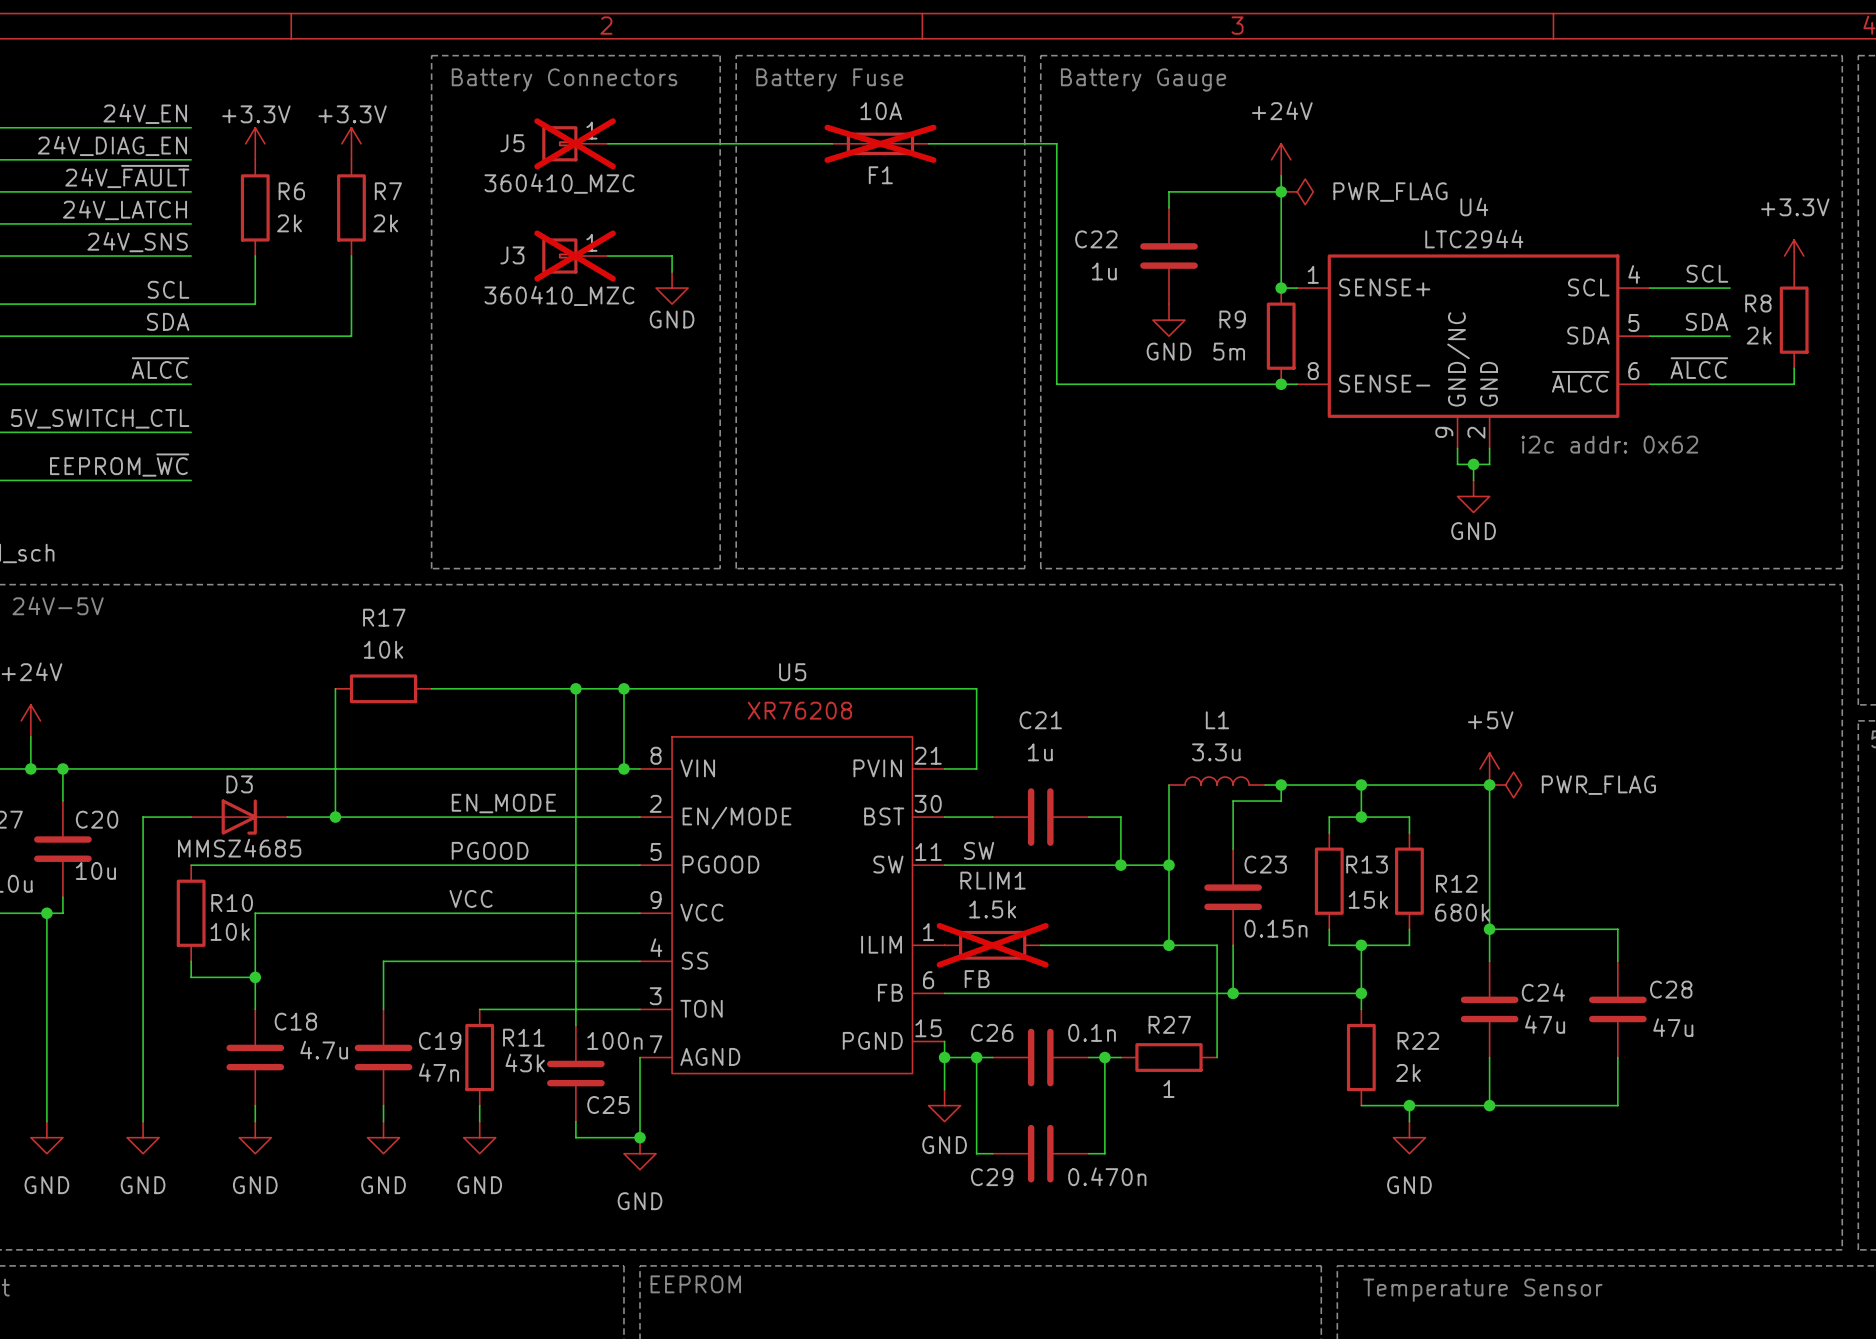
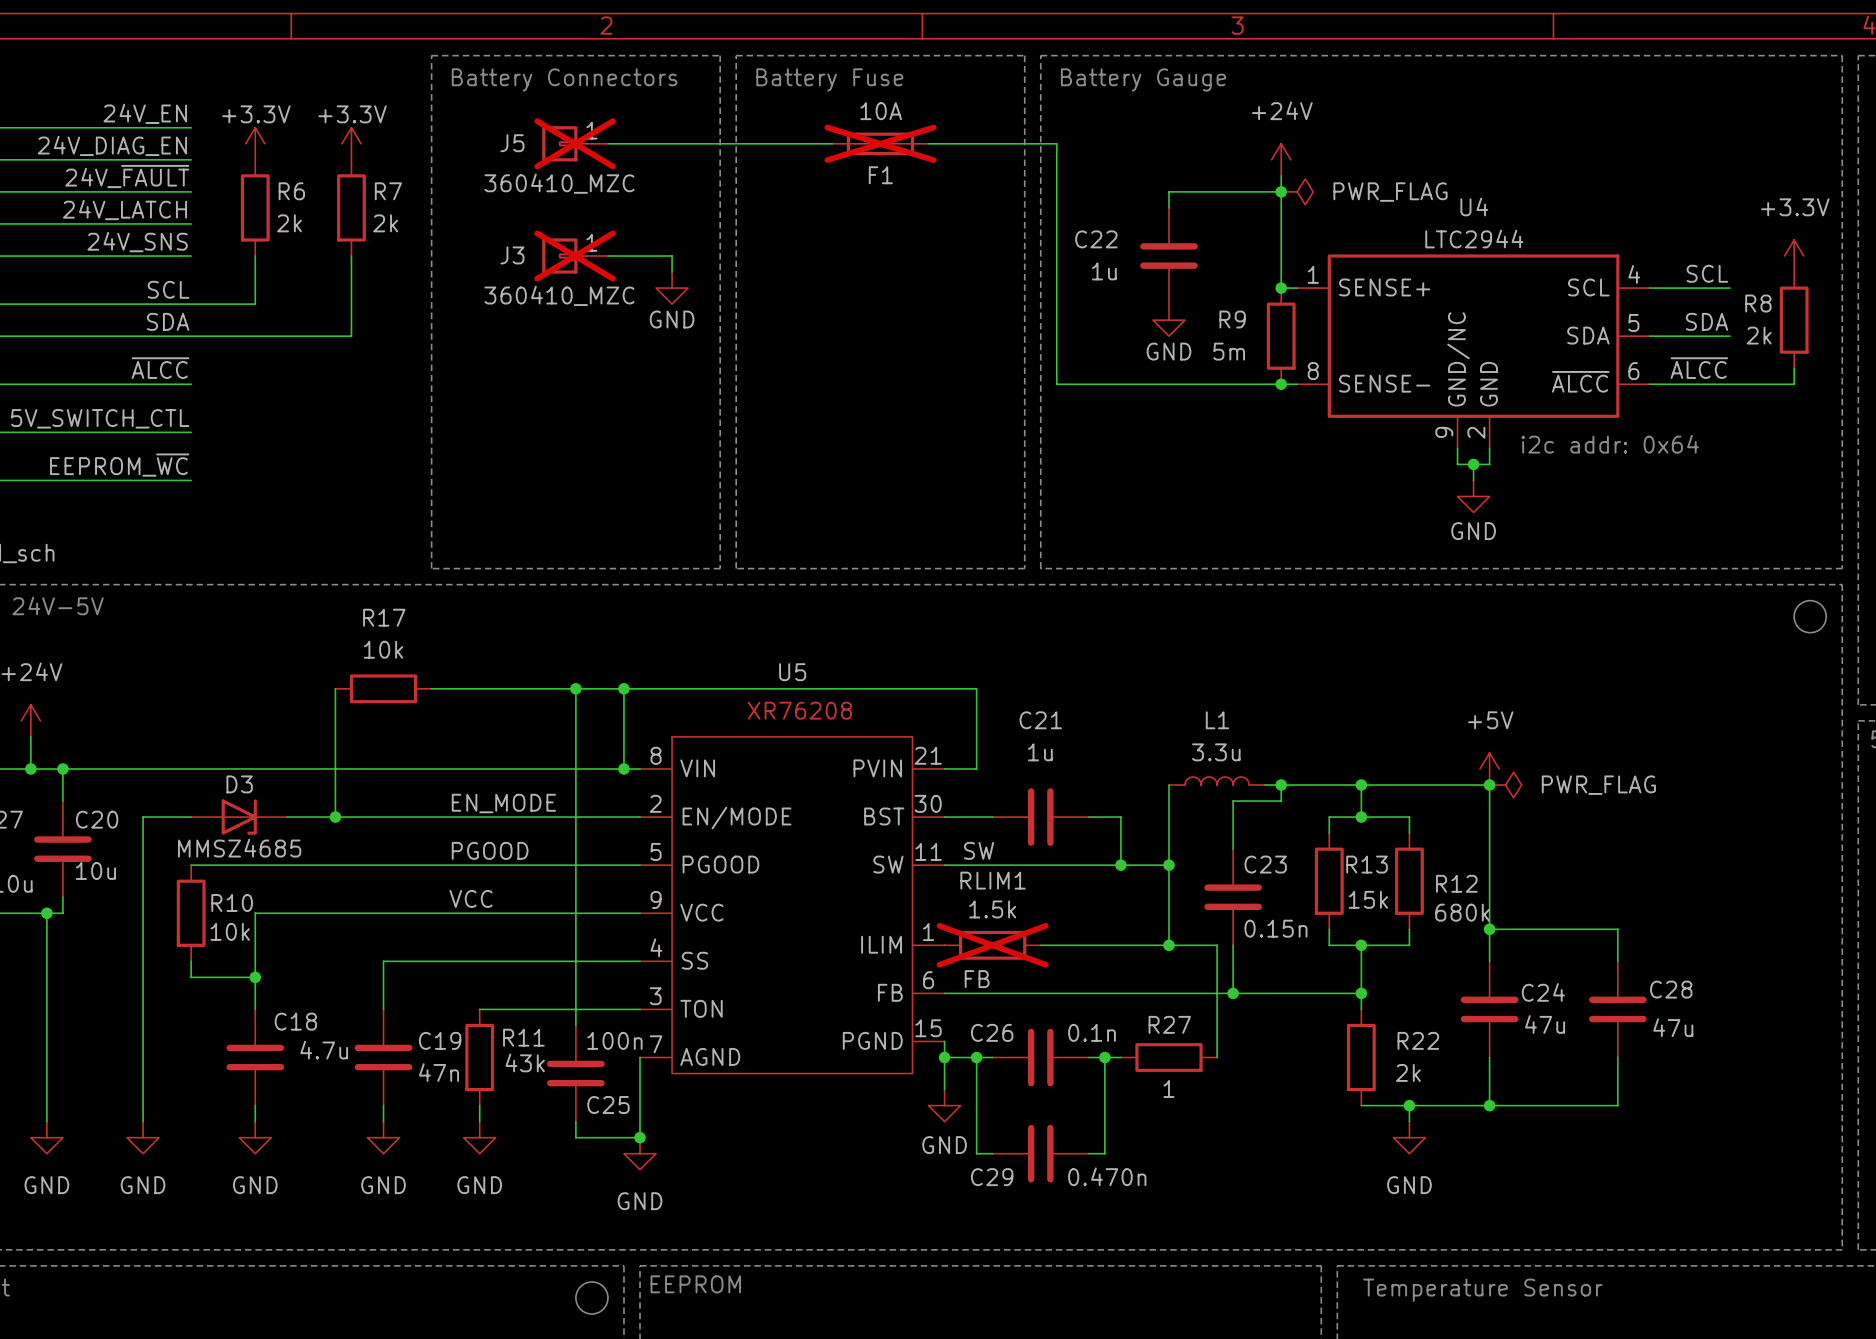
text: i2c addr: 0x62 (1609, 444) -> i2c addr: 0x64 (1610, 444)
drawing: none -> [1794, 600, 1827, 633]
drawing: none -> [575, 1281, 608, 1315]

